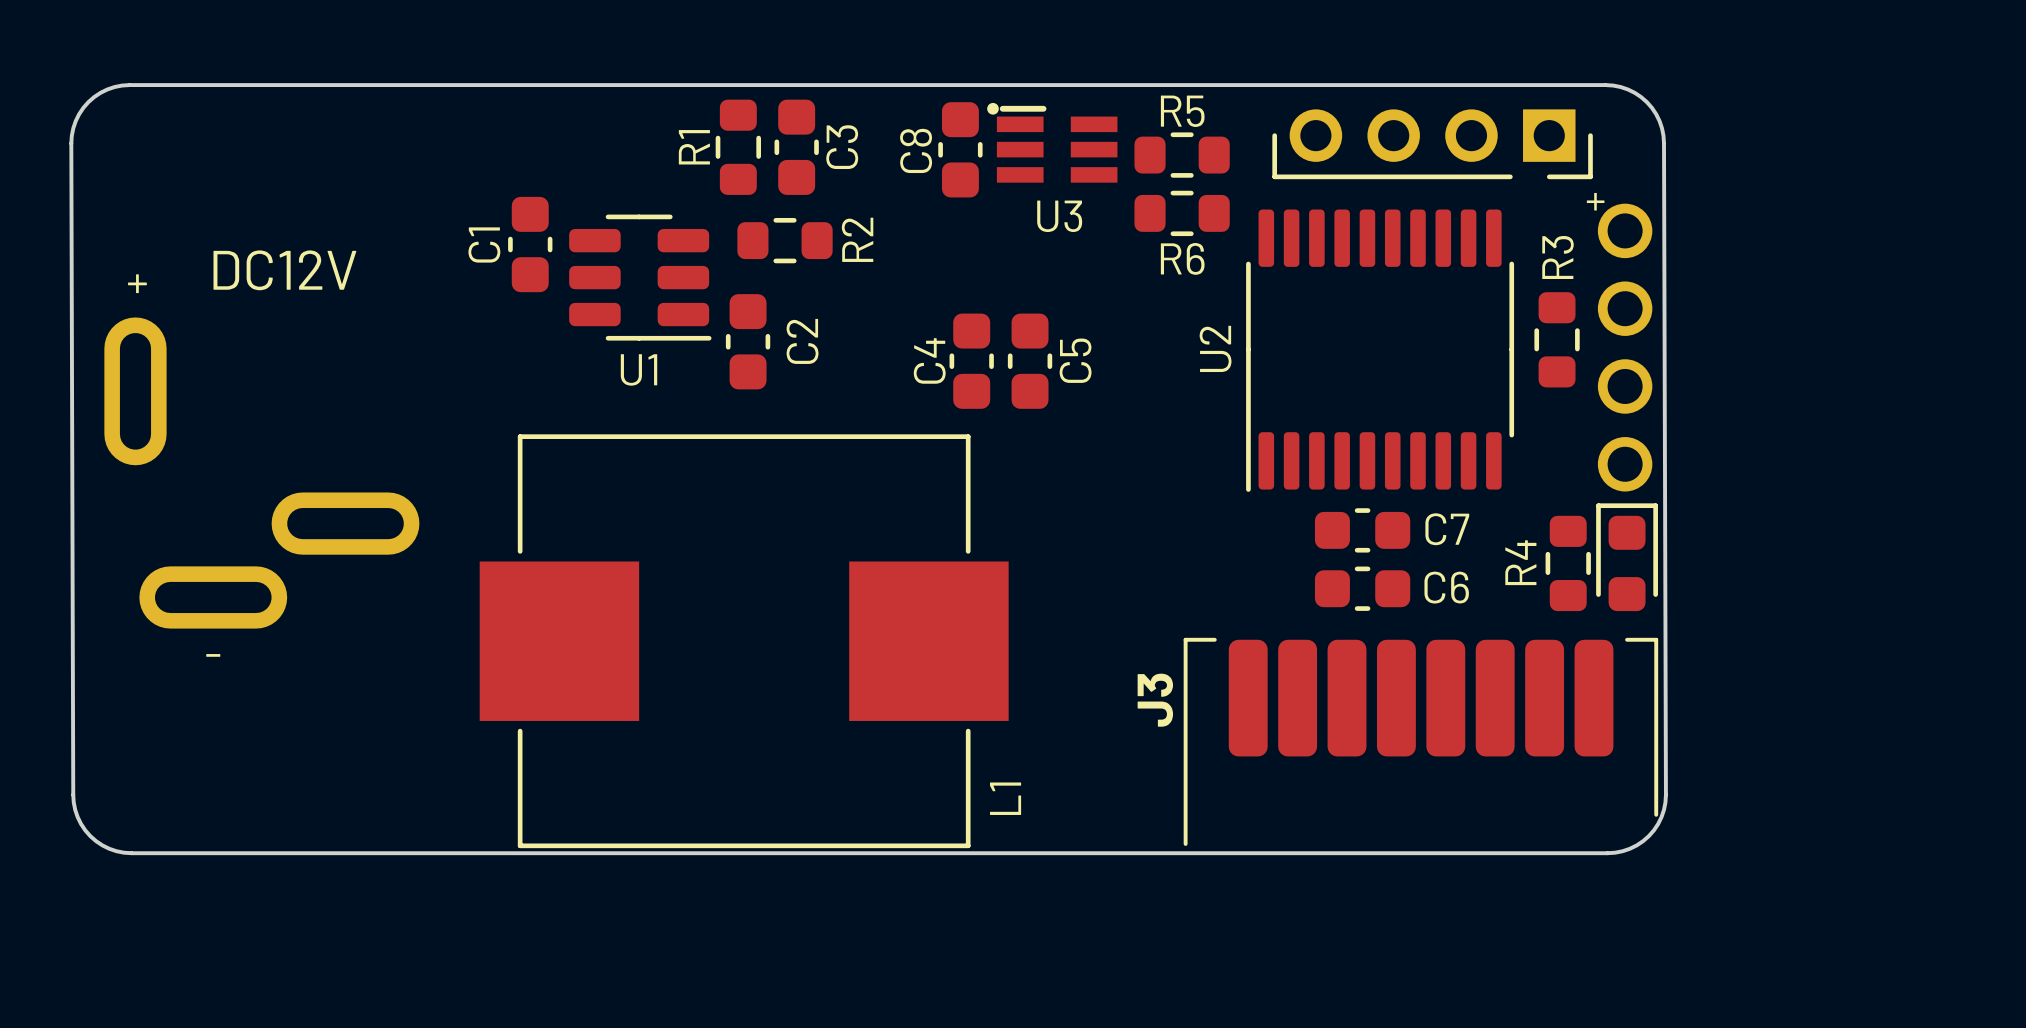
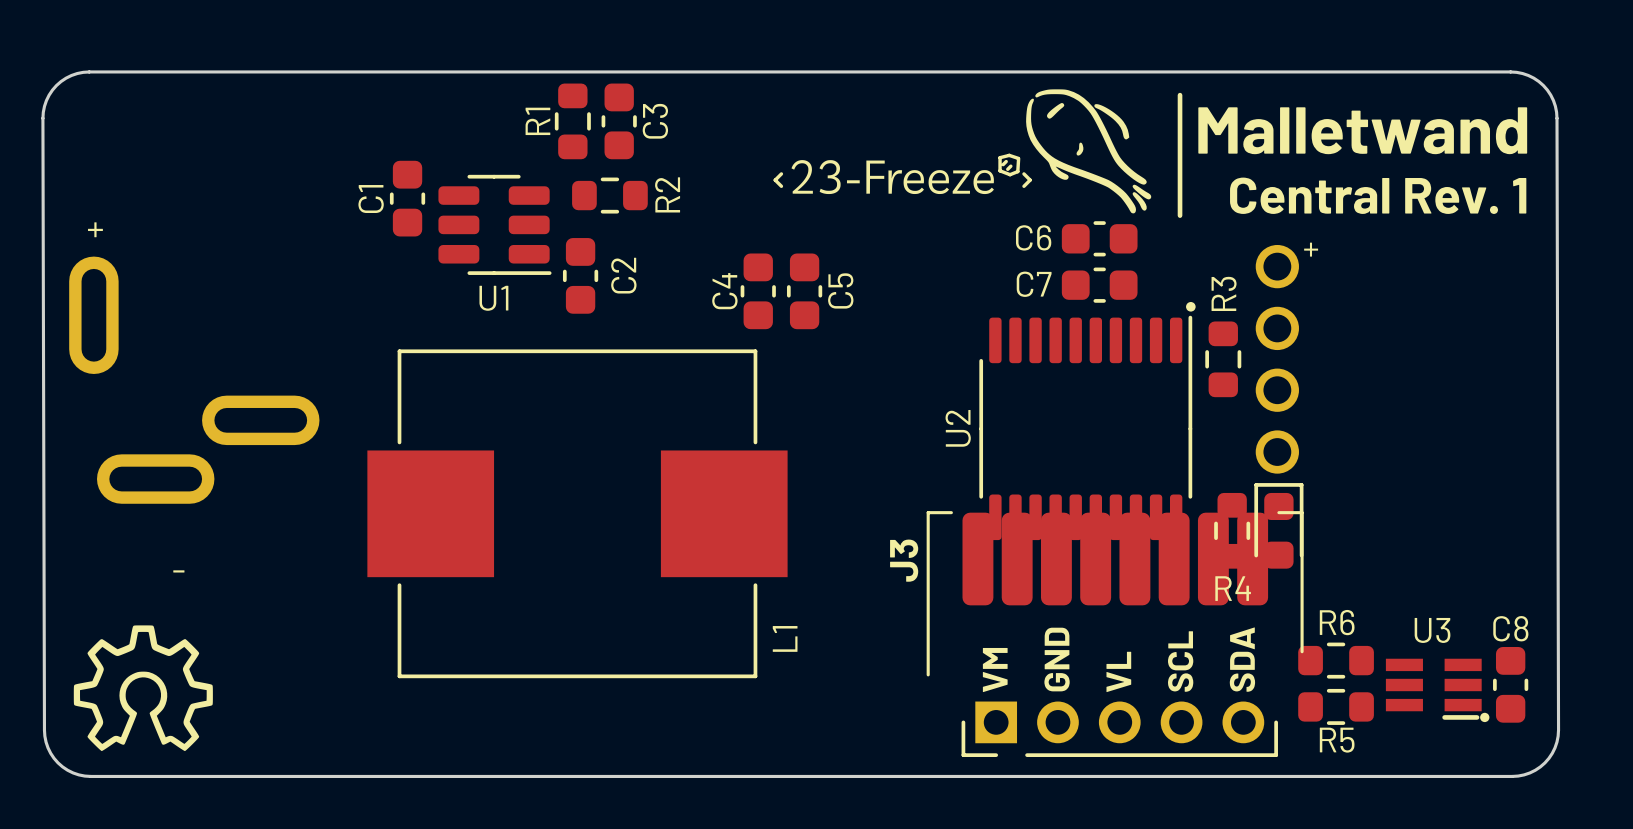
board edge: (1605, 85) (1627, 89) (1641, 97) (1656, 114) (1663, 135) (1665, 794) (1661, 817) (1648, 836) (1629, 848) (1607, 853) (131, 853) (109, 848) (96, 841) (85, 830) (77, 817) (73, 794) (71, 143) -> (1261, 71) (1516, 72) (1528, 75) (1538, 81) (1547, 90) (1553, 100) (1556, 118) (1558, 730) (1556, 742) (1552, 753) (1540, 766) (1529, 772) (1512, 776) (90, 776) (73, 772) (58, 762) (50, 753) (46, 742) (44, 730) (42, 118)
drawing: none -> [791, 89, 1152, 214]
R5 name position: R5 (1182, 111) -> R5 (1337, 740)
line: none -> (1180, 95) (1180, 215)
U3 rotation: 0° (1052, 142) -> 180° (1437, 690)
U3 position: (1052, 142) -> (1437, 690)
part: (1432, 144) -> none
C8 position: (960, 149) -> (1510, 684)
C8 name rotation: 0° (916, 150) -> 90° clockwise (1510, 628)
C8 name position: C8 (916, 150) -> C8 (1510, 628)
R5 position: (1182, 155) -> (1336, 706)
text: none -> Malletwand (1362, 130)
line: none -> (1018, 158) (1009, 155) (1000, 157) (1000, 170) (1010, 174) (1017, 171) (1018, 159)
line: none -> (1006, 161) (1003, 164)
line: none -> (1010, 166) (1007, 169)
line: none -> (781, 173) (775, 180) (781, 186)
R6 position: (1182, 213) -> (1336, 660)
line: none -> (1023, 173) (1030, 180) (1023, 186)
text: none -> Central Rev. 1 (1378, 195)
R6 name position: R6 (1182, 258) -> R6 (1337, 622)
text: DC12V (284, 270) -> none
R3 position: (1557, 339) -> (1223, 359)
part: (1625, 347) -> none
U2 rotation: 0° (1380, 350) -> 180° (1085, 427)
U2 position: (1380, 350) -> (1085, 427)
drawing: none -> [1186, 302, 1196, 312]
part: none -> (1277, 359)
C7 name position: C7 (1447, 529) -> C7 (1034, 284)
C7 position: (1362, 530) -> (1099, 285)
part position: (1627, 557) -> (1278, 525)
R4 name rotation: 0° (1520, 562) -> 90° clockwise (1233, 588)
R4 name position: R4 (1520, 562) -> R4 (1233, 588)
R4 position: (1568, 563) -> (1232, 530)
C6 name position: C6 (1446, 587) -> C6 (1033, 237)
C6 position: (1362, 588) -> (1099, 238)
text position: - (213, 655) -> - (178, 571)
drawing: none -> [73, 625, 213, 752]
text: none -> GND (1057, 659)
text: none -> SDA (1242, 659)
text: none -> SCL (1180, 661)
text: none -> VM (995, 670)
text: none -> VL (1118, 671)
part: none -> (1119, 729)

